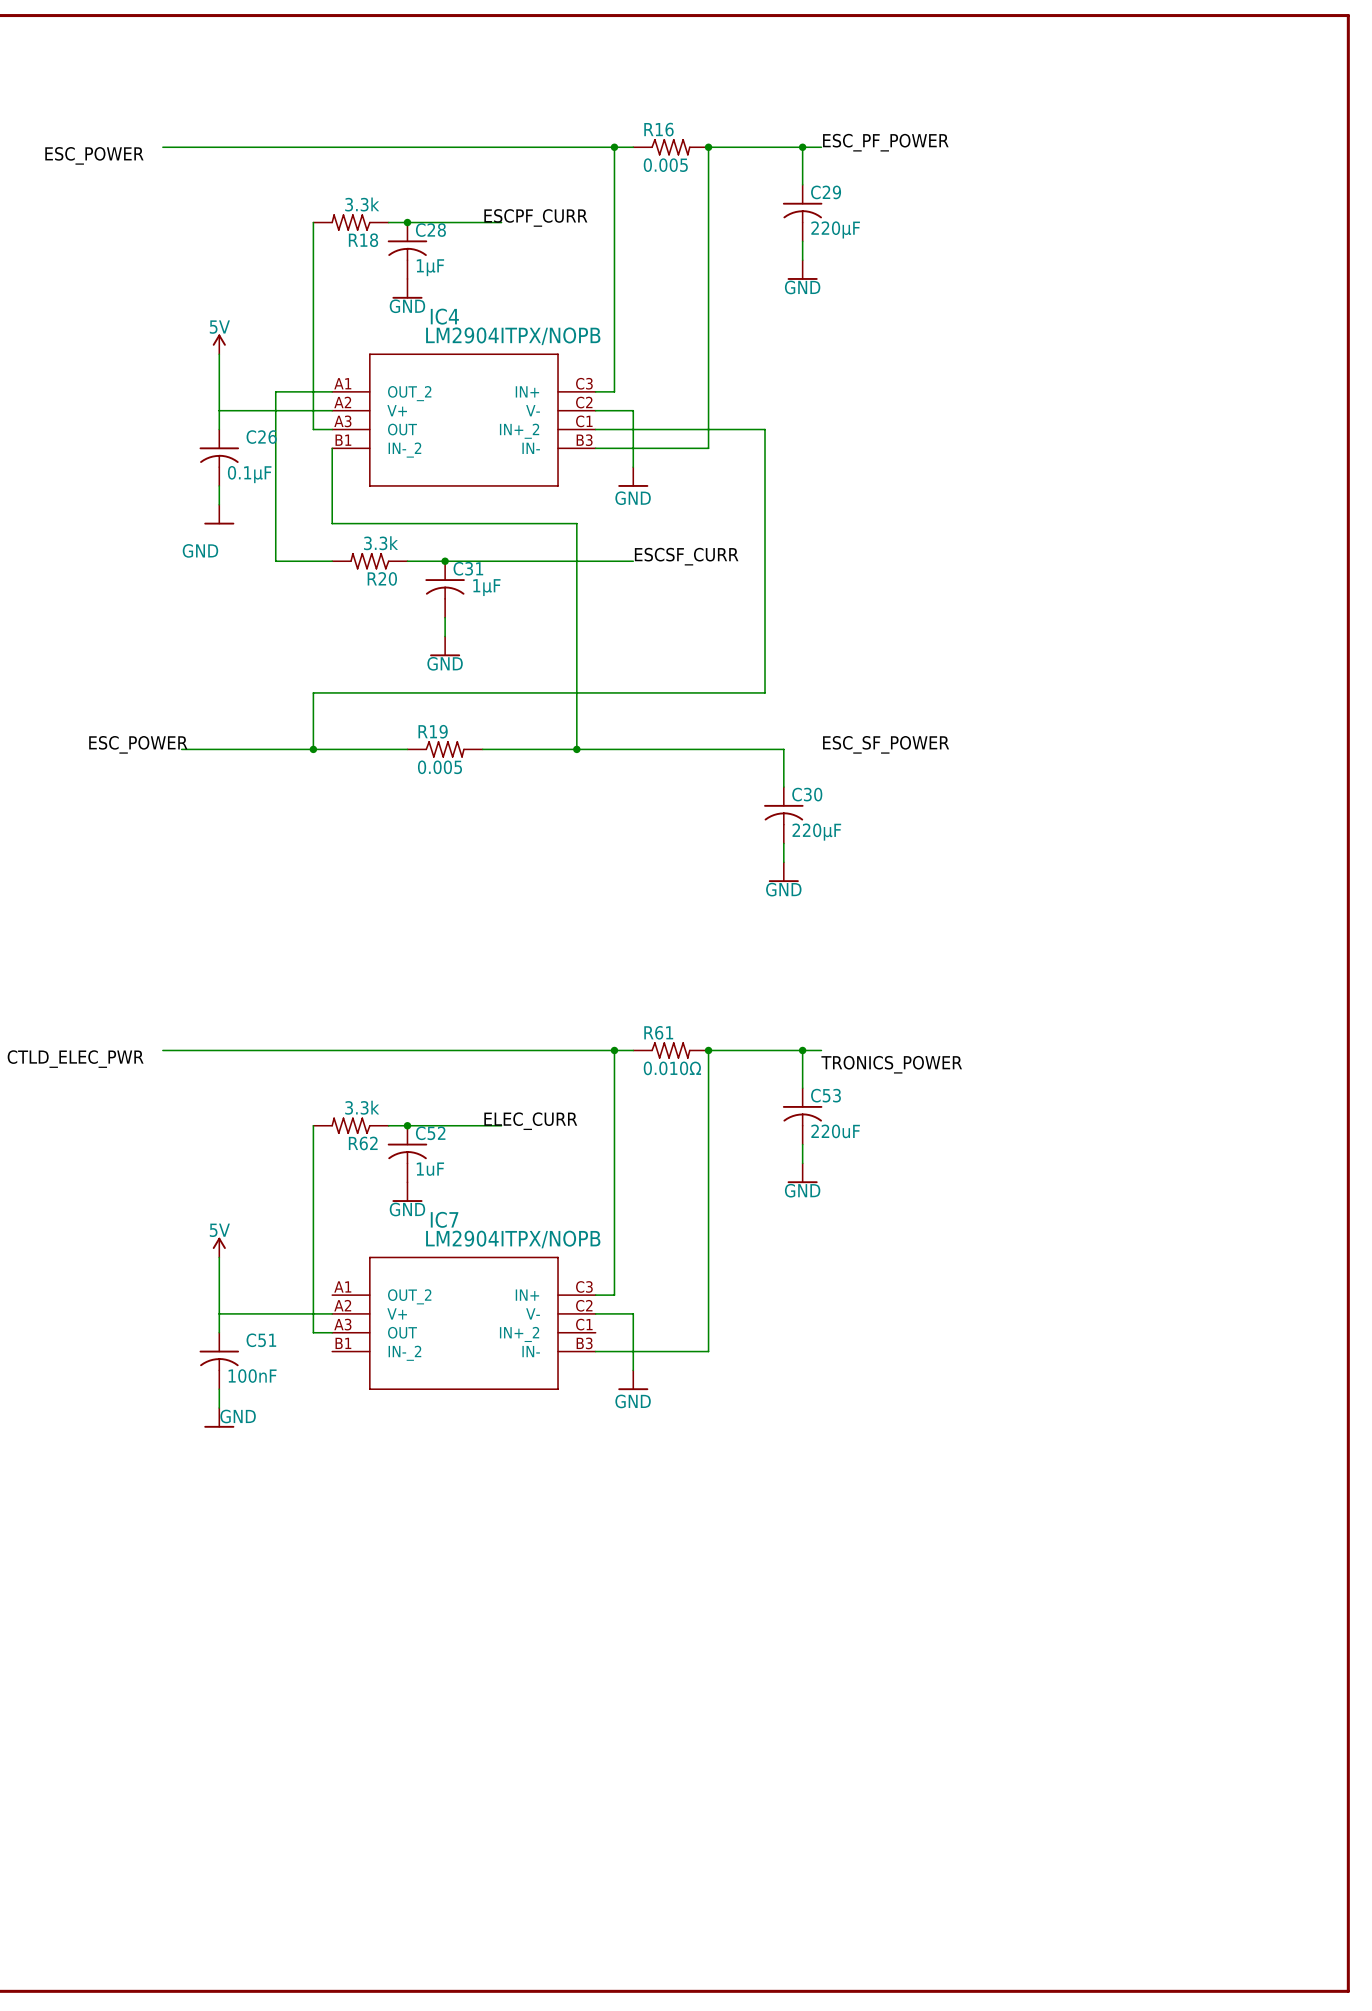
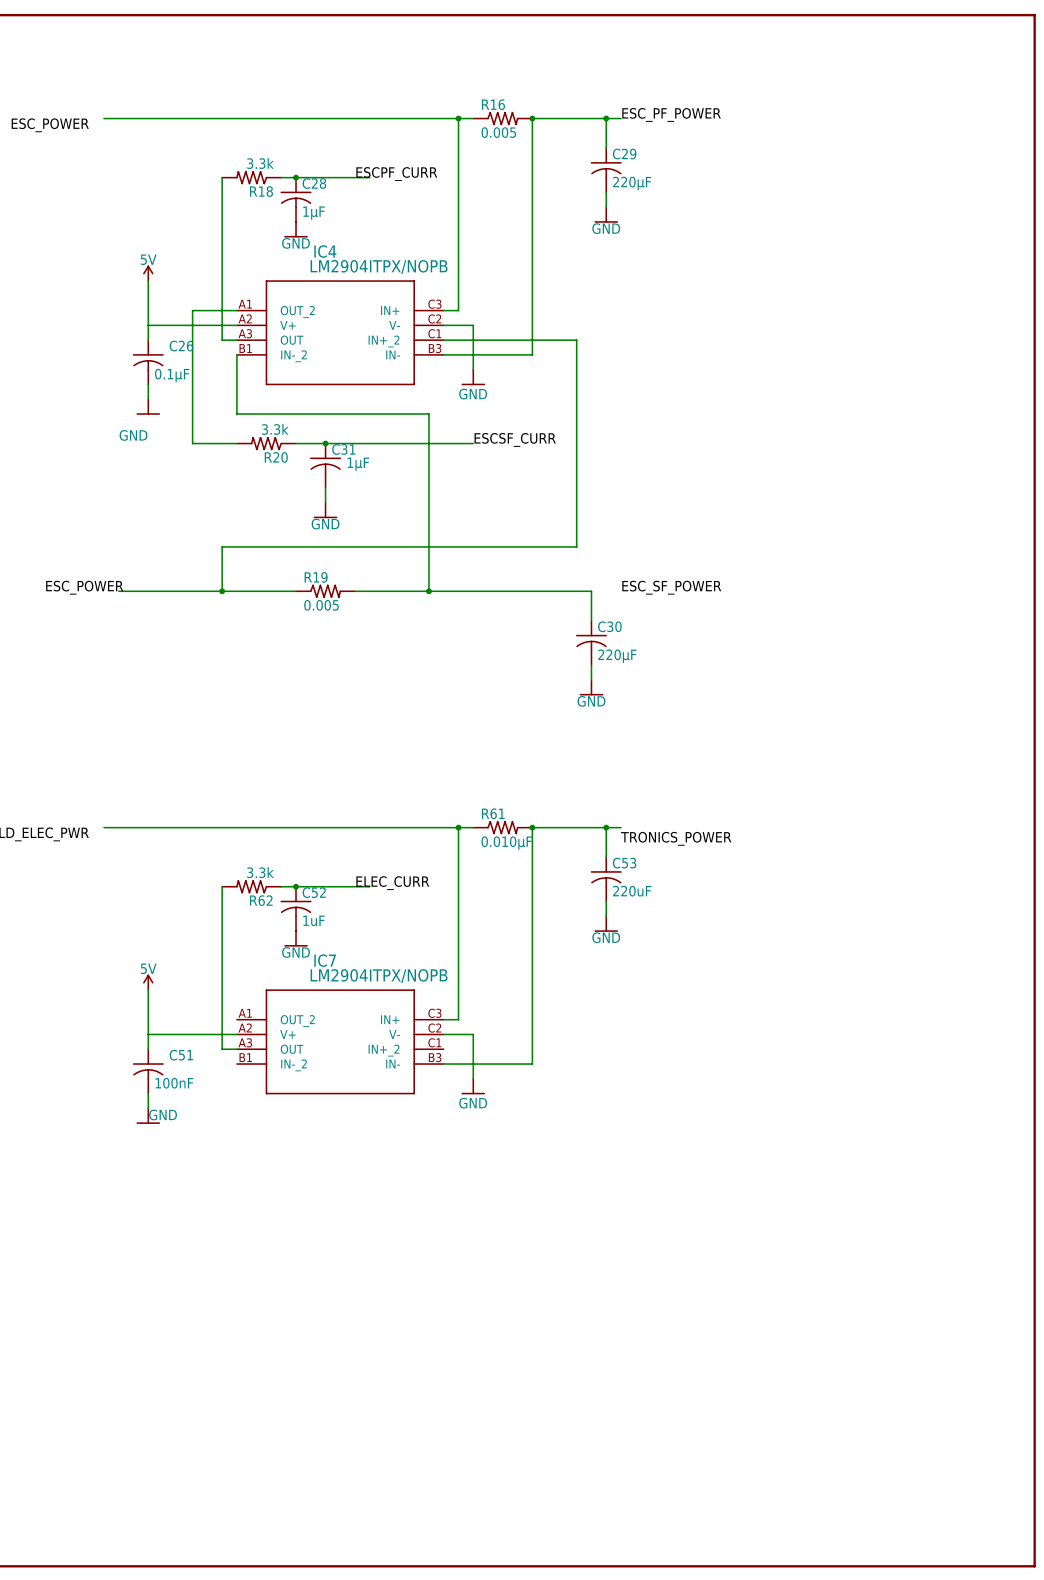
R61 value: 0.010Ω (672, 1068) -> 0.010µF (506, 843)

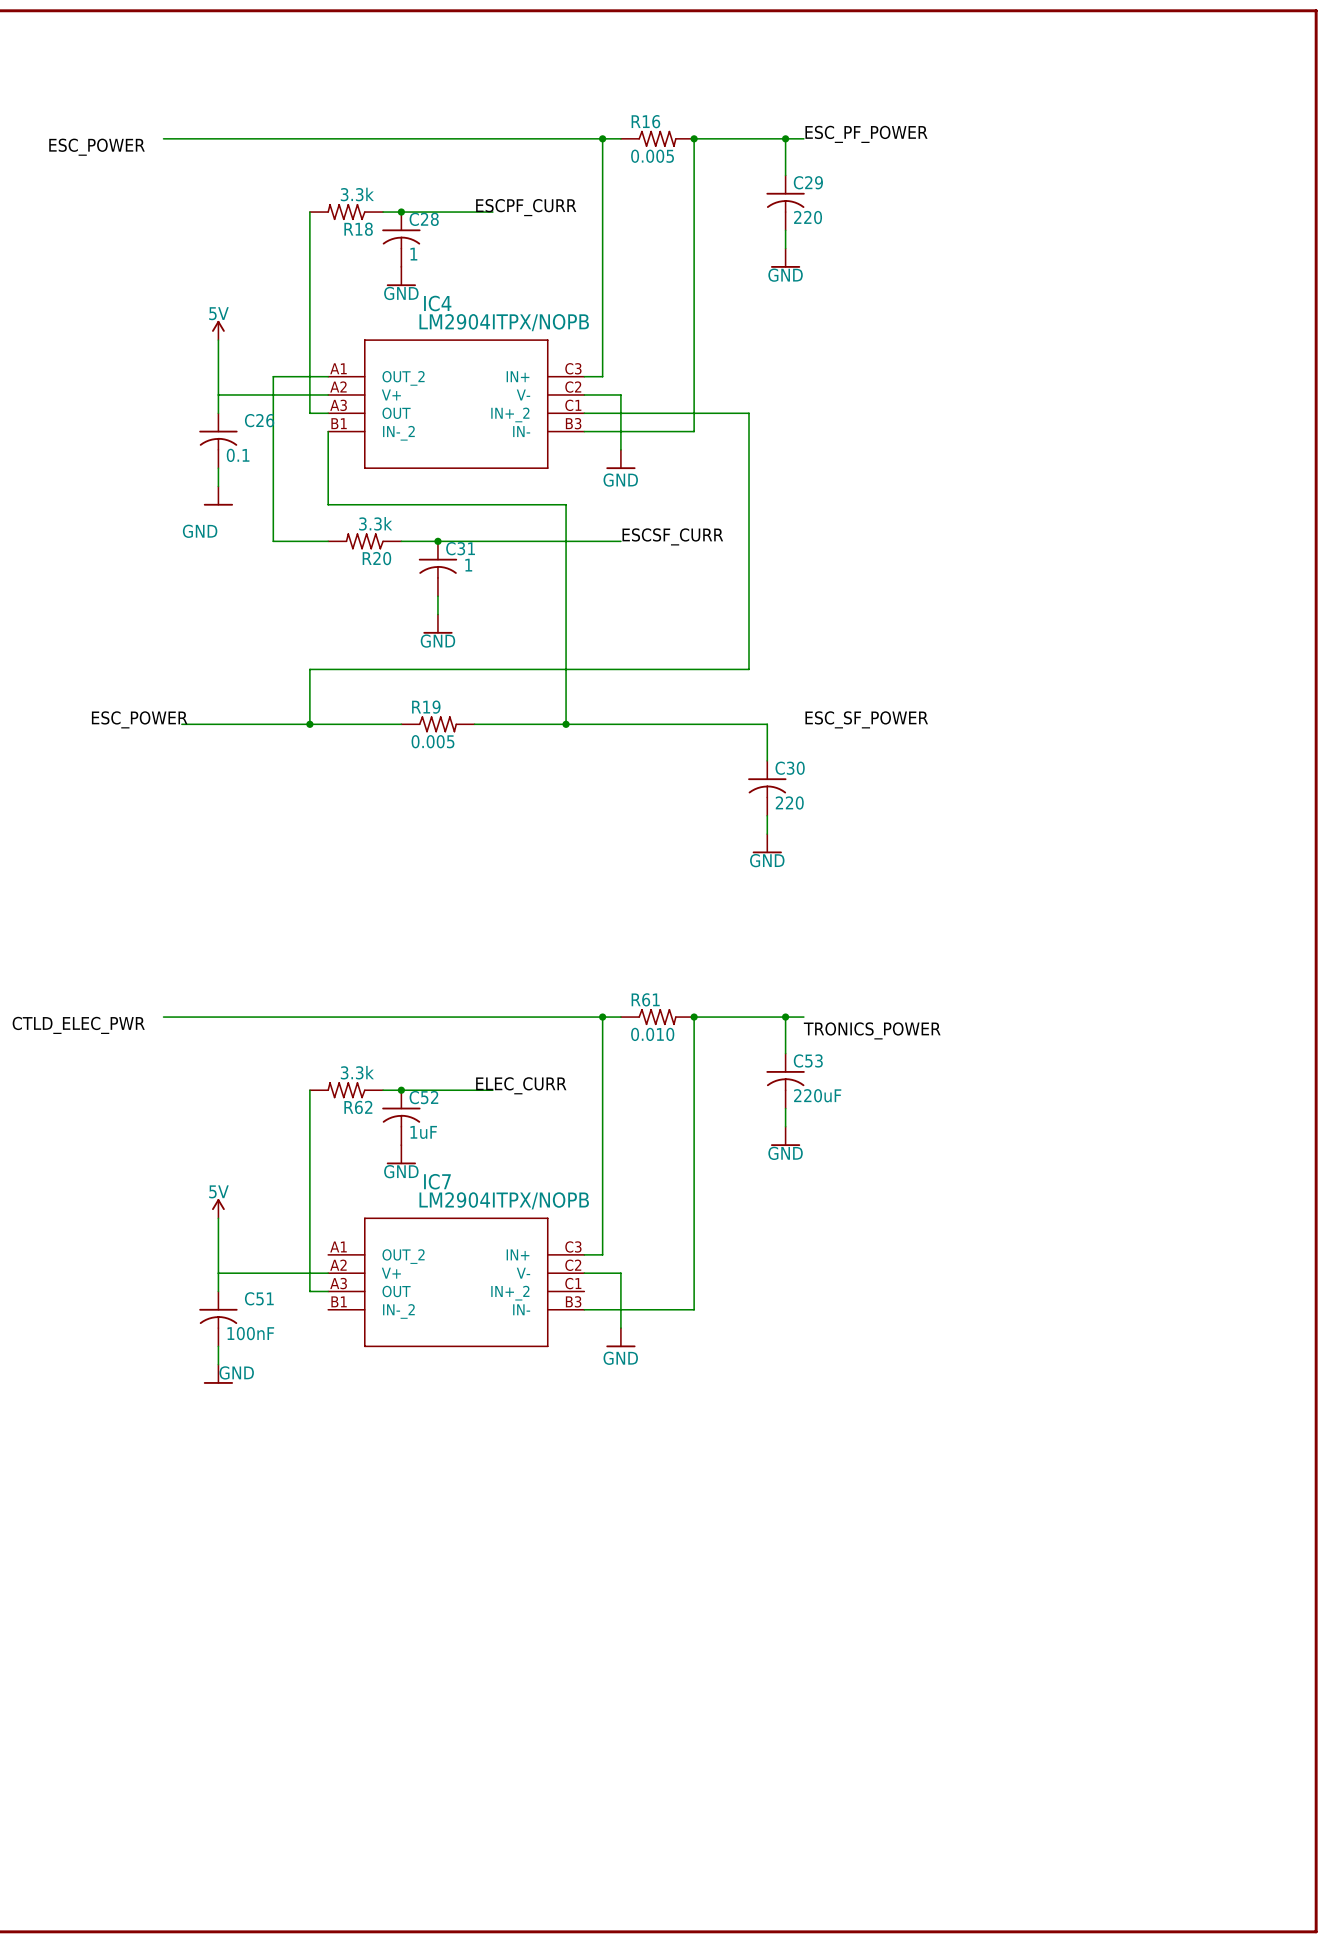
C29 value: 220µF (632, 183) -> 220 (808, 217)
C28 value: 1µF (314, 213) -> 1 (413, 254)
C26 value: 0.1µF (172, 375) -> 0.1 (238, 455)
C31 value: 1µF (358, 464) -> 1 (468, 565)
C30 value: 220µF (617, 656) -> 220 (789, 802)
R61 value: 0.010µF (506, 843) -> 0.010 (652, 1034)

